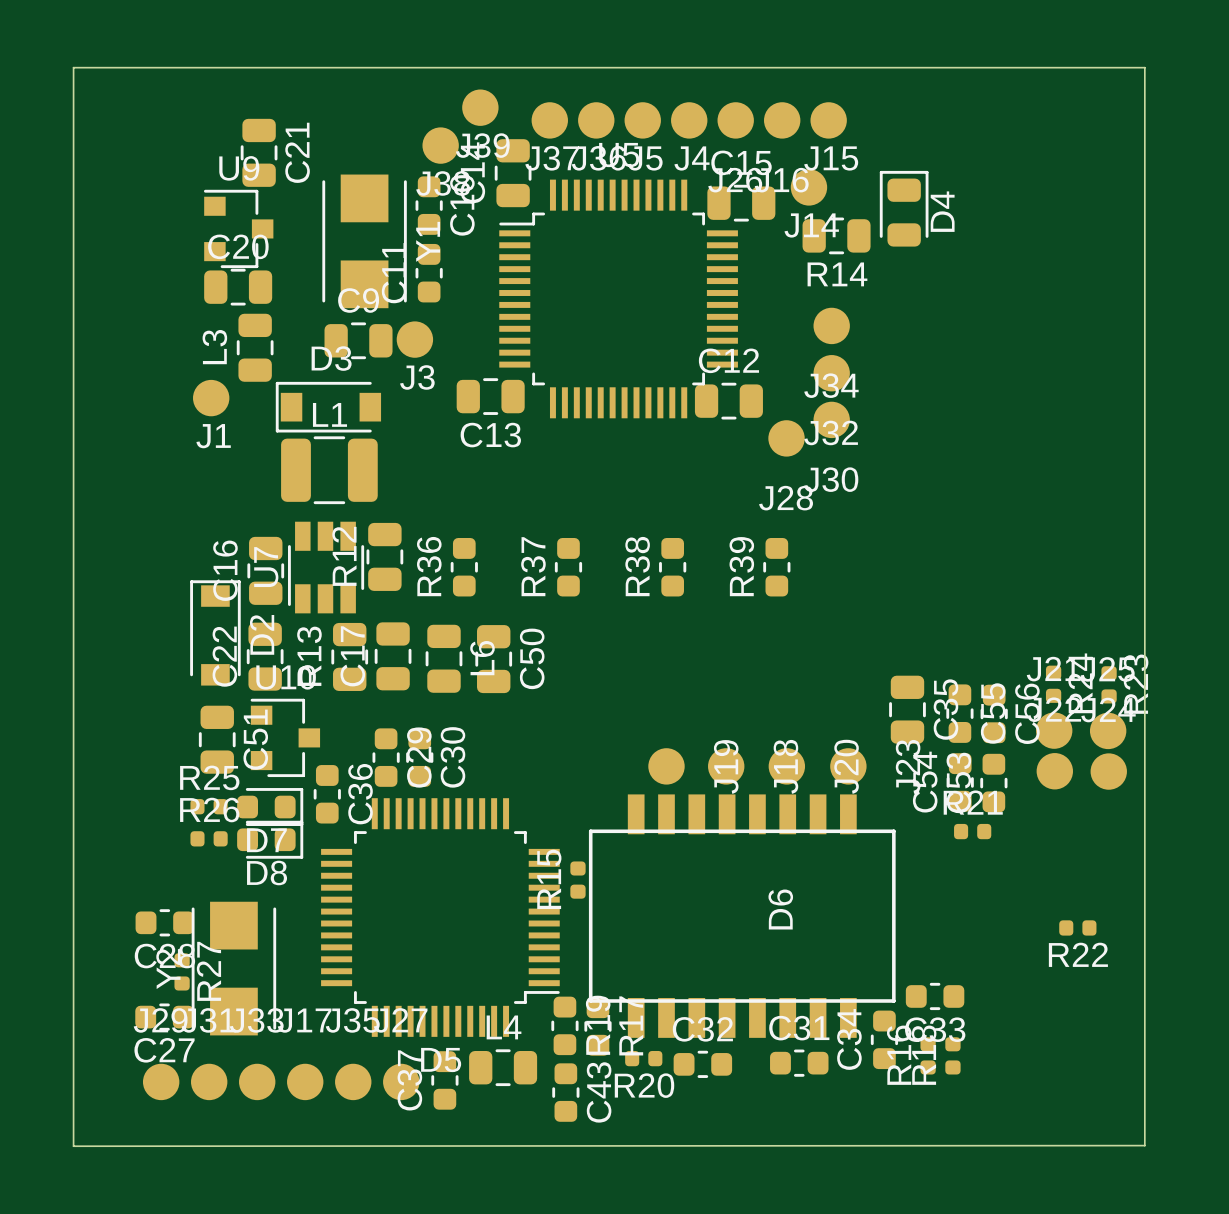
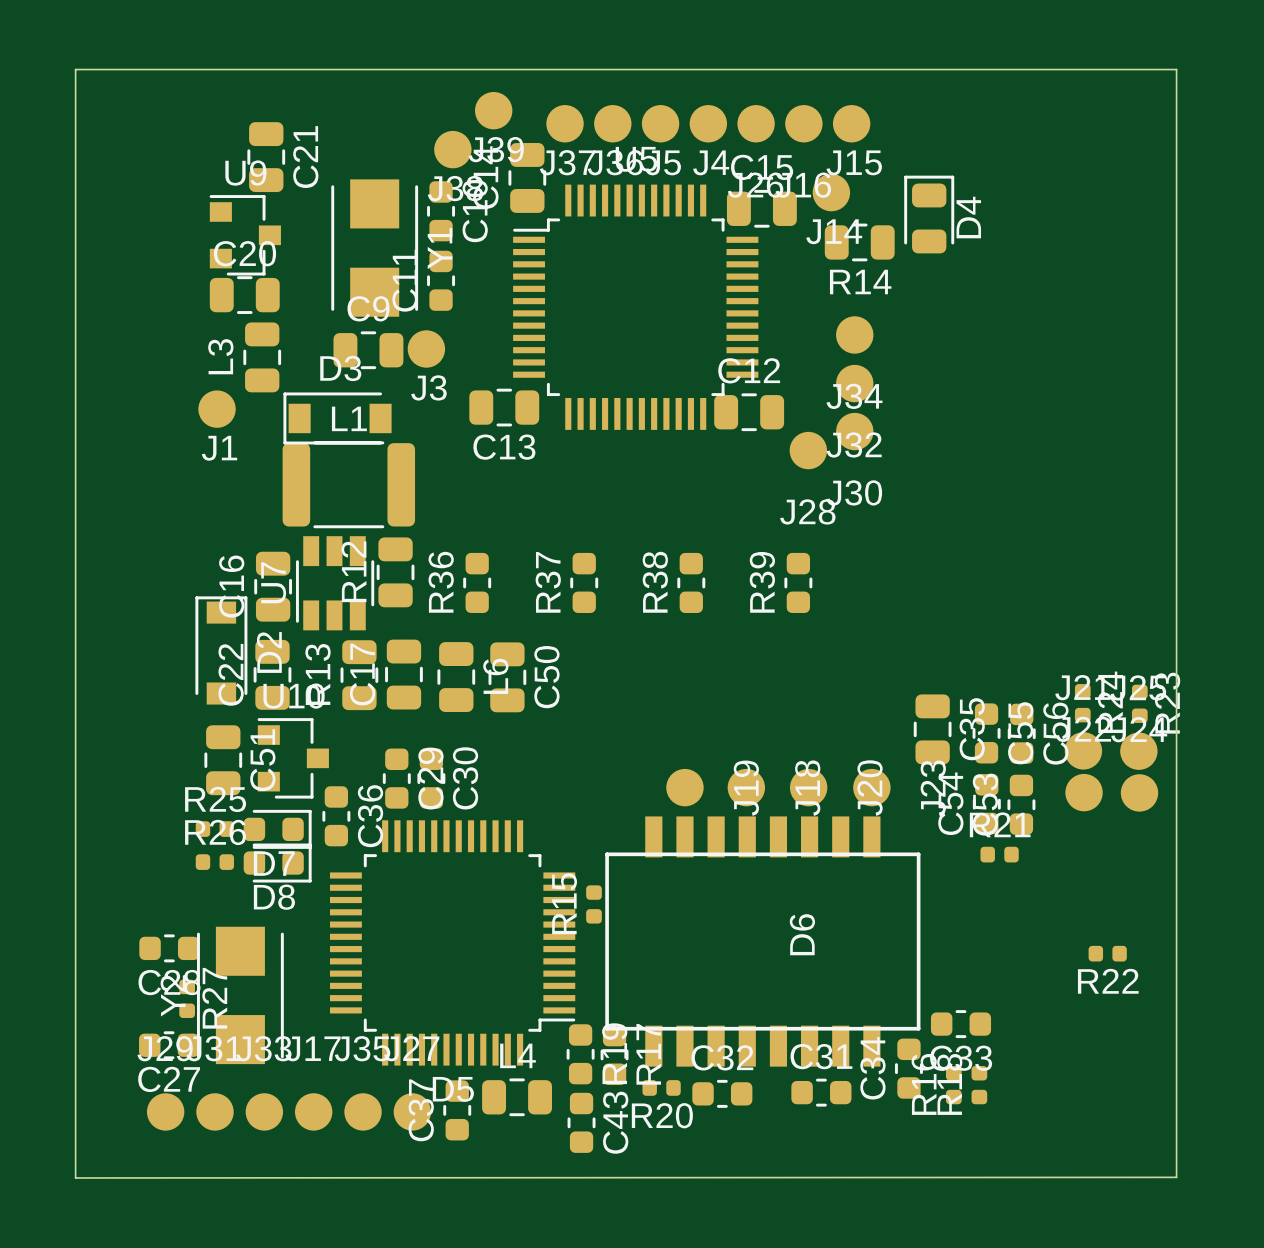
L1 footprint: [281, 436, 378, 505] -> [282, 441, 416, 529]

